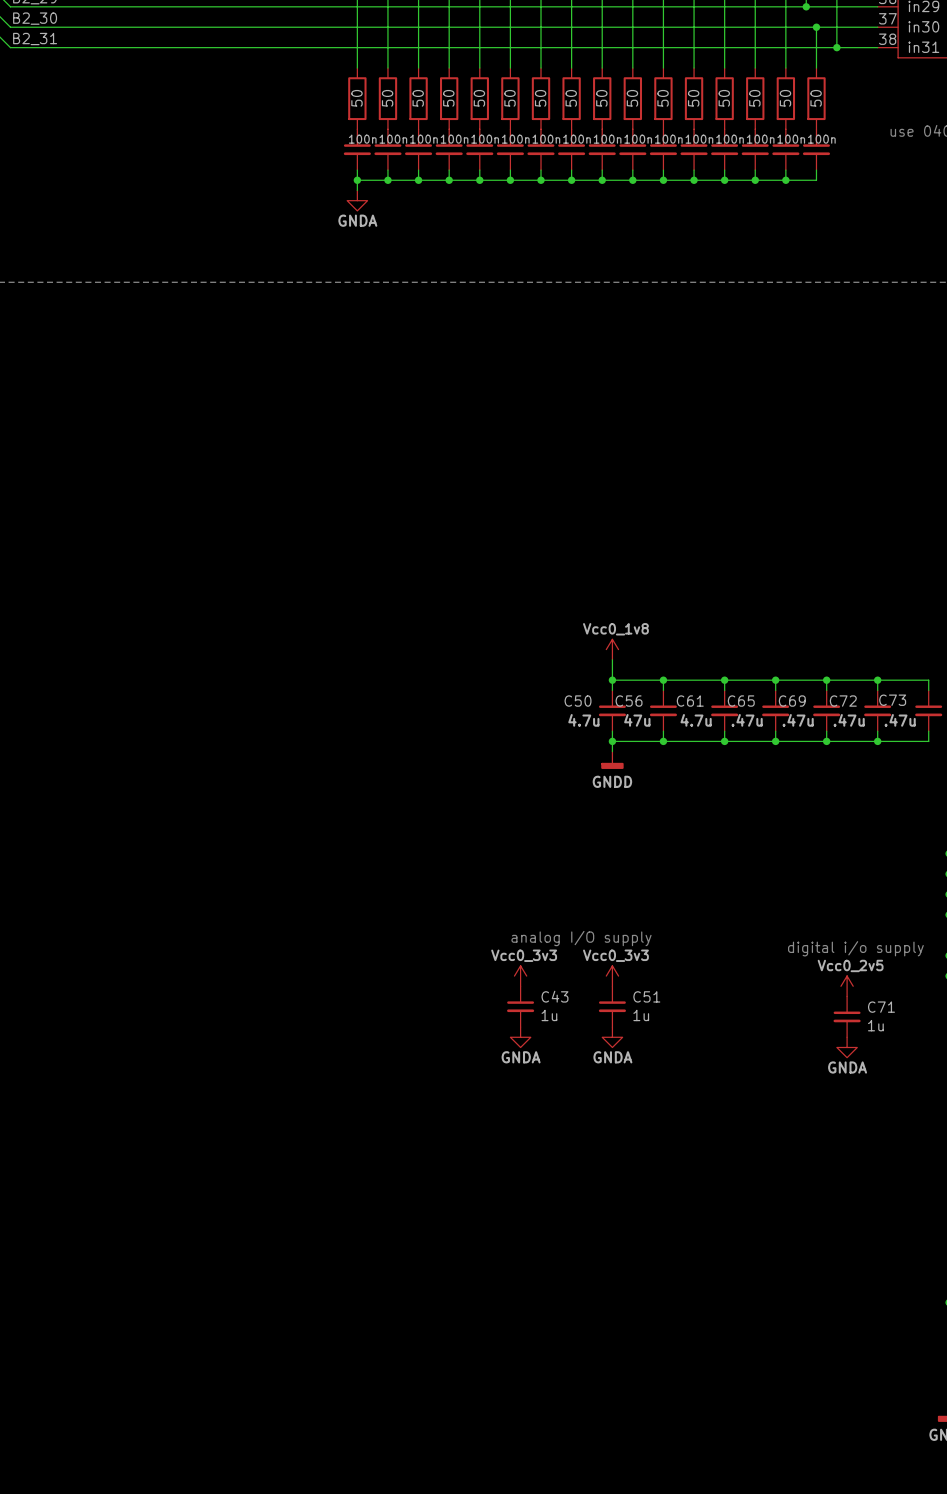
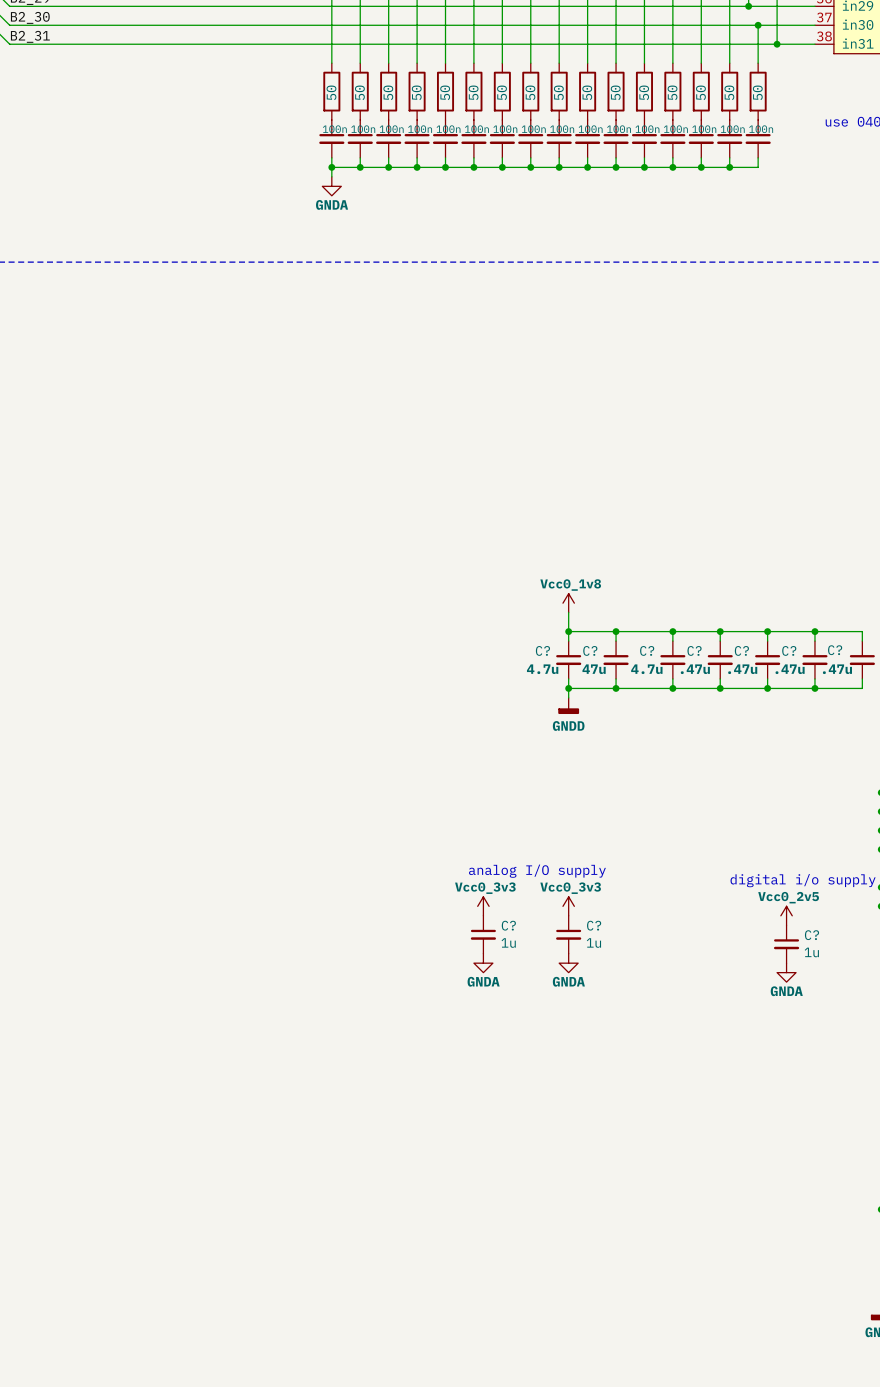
C73 name: C73 (892, 700) -> C? (835, 650)
C50 name: C50 (578, 701) -> C? (542, 650)
C56 name: C56 (629, 701) -> C? (590, 650)
C61 name: C61 (690, 701) -> C? (647, 650)
C65 name: C65 (741, 701) -> C? (694, 650)
C69 name: C69 (792, 701) -> C? (741, 650)
C72 name: C72 (843, 701) -> C? (789, 650)
C43 name: C43 (554, 996) -> C? (508, 925)
C51 name: C51 (646, 996) -> C? (594, 925)
C71 name: C71 (881, 1007) -> C? (812, 935)

